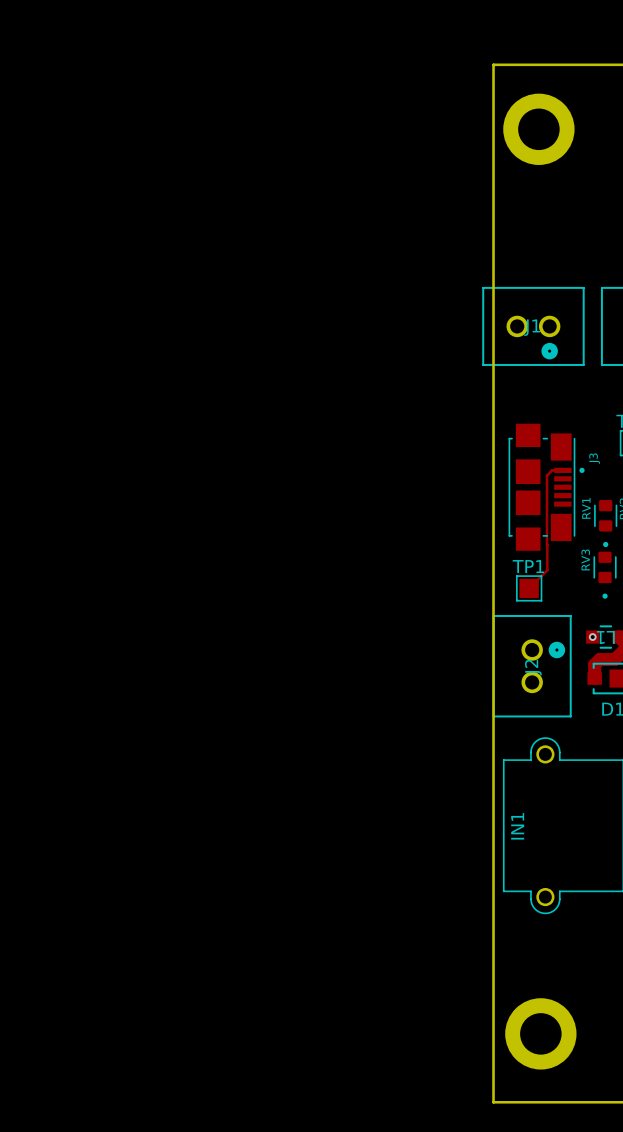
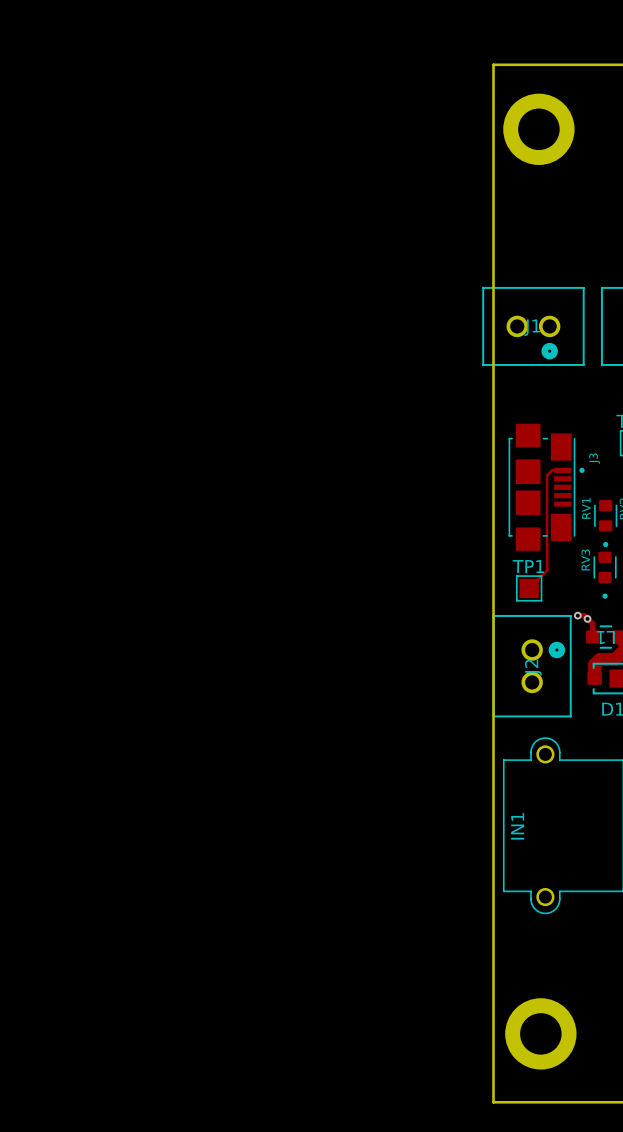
top track: none -> (577, 615) (584, 615) (592, 624) (592, 637)
via: none -> (577, 615)
via: none -> (587, 618)
via: (592, 637) -> none

